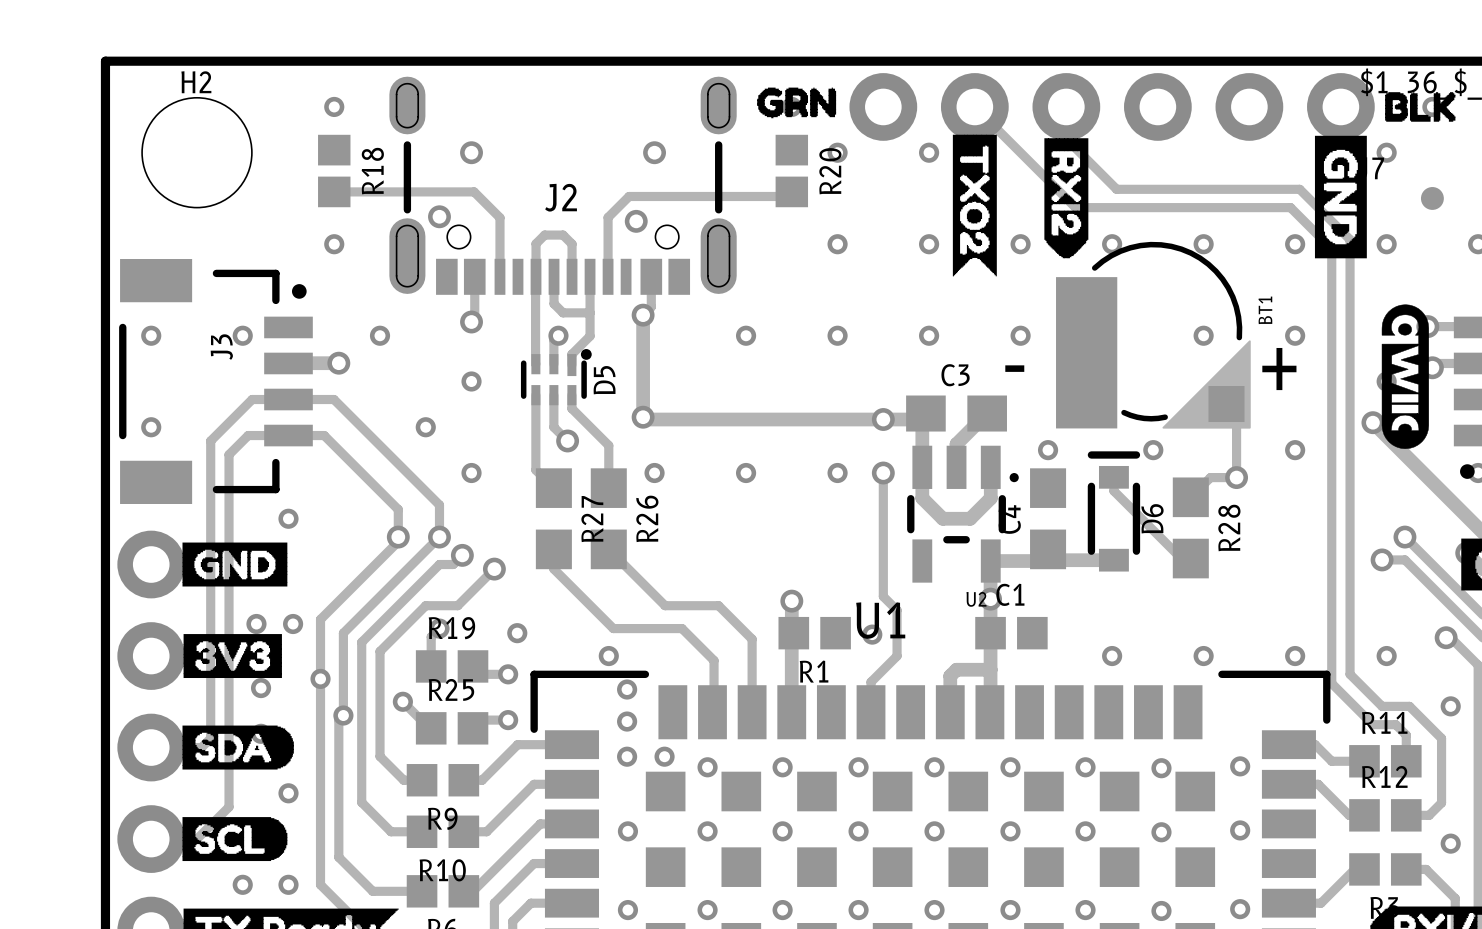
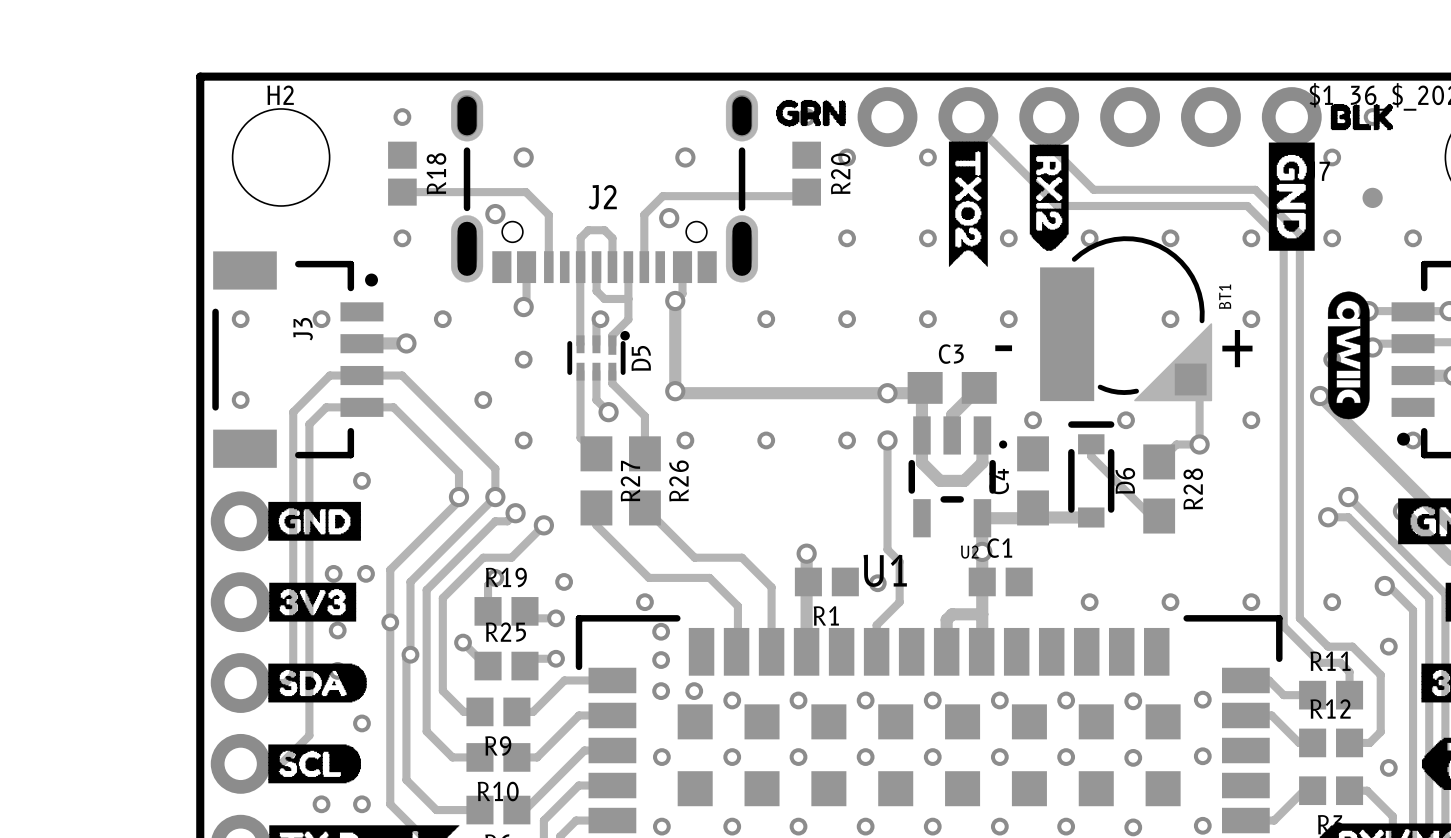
J2 footprint: [389, 76, 737, 295] -> [451, 90, 759, 284]

